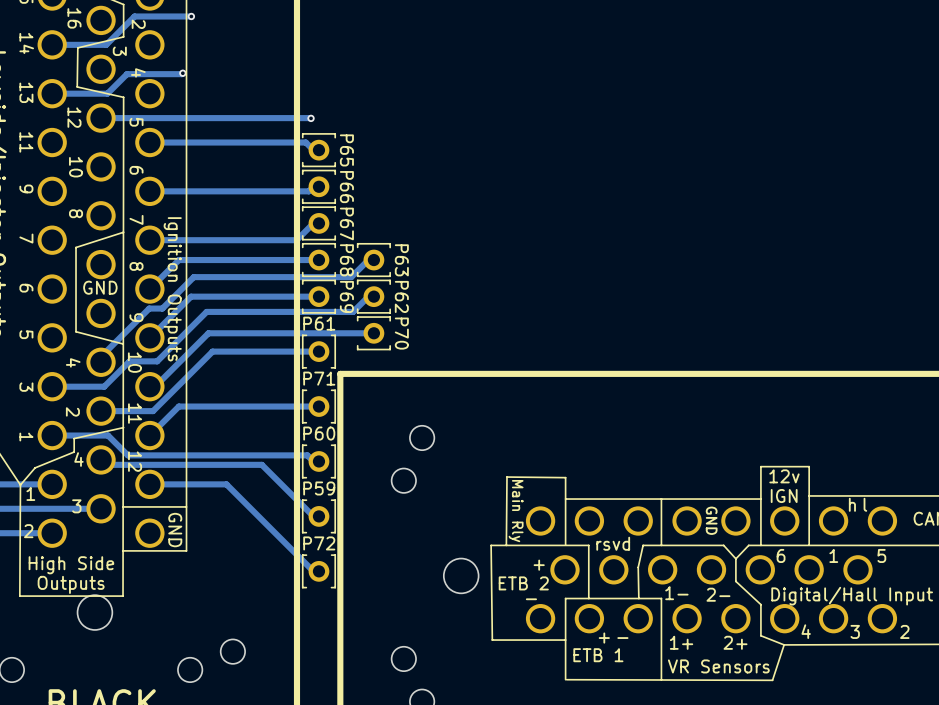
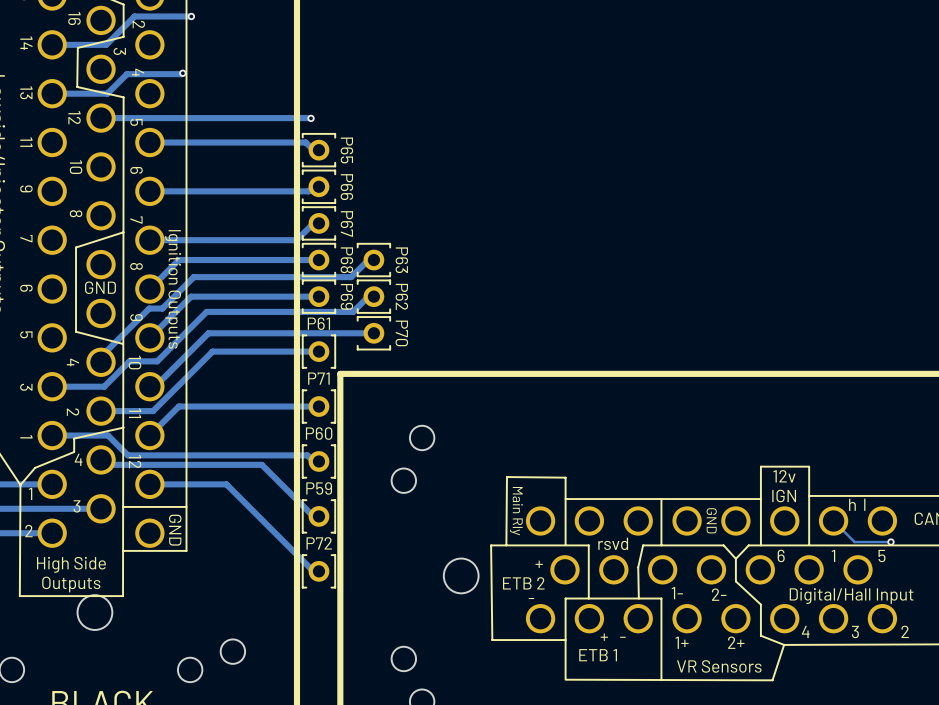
track: none -> (833, 521) (854, 542) (890, 542)
via: none -> (890, 542)

